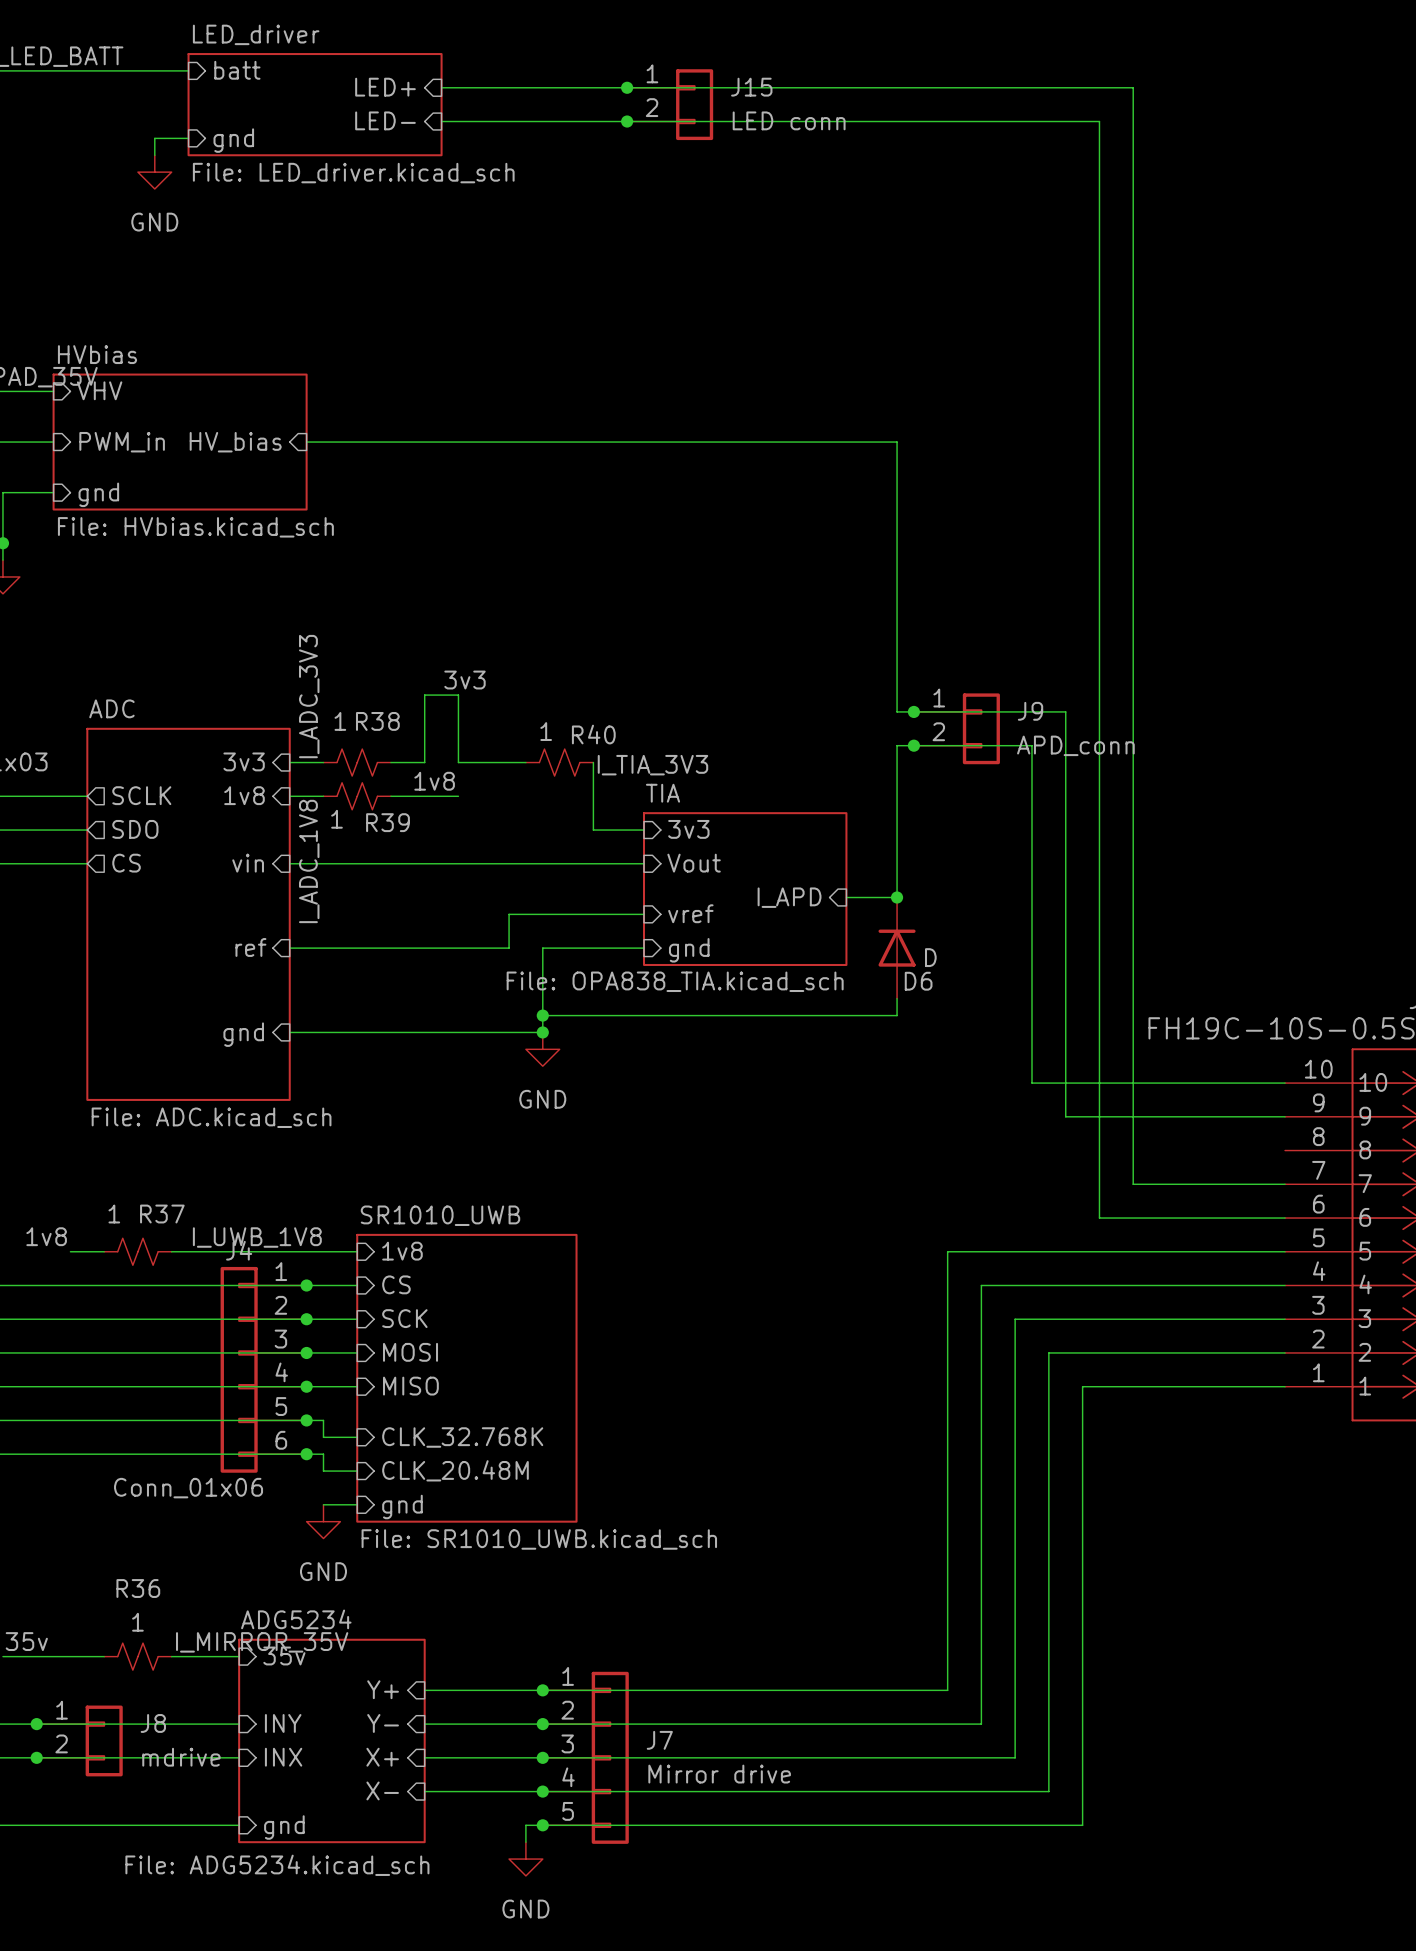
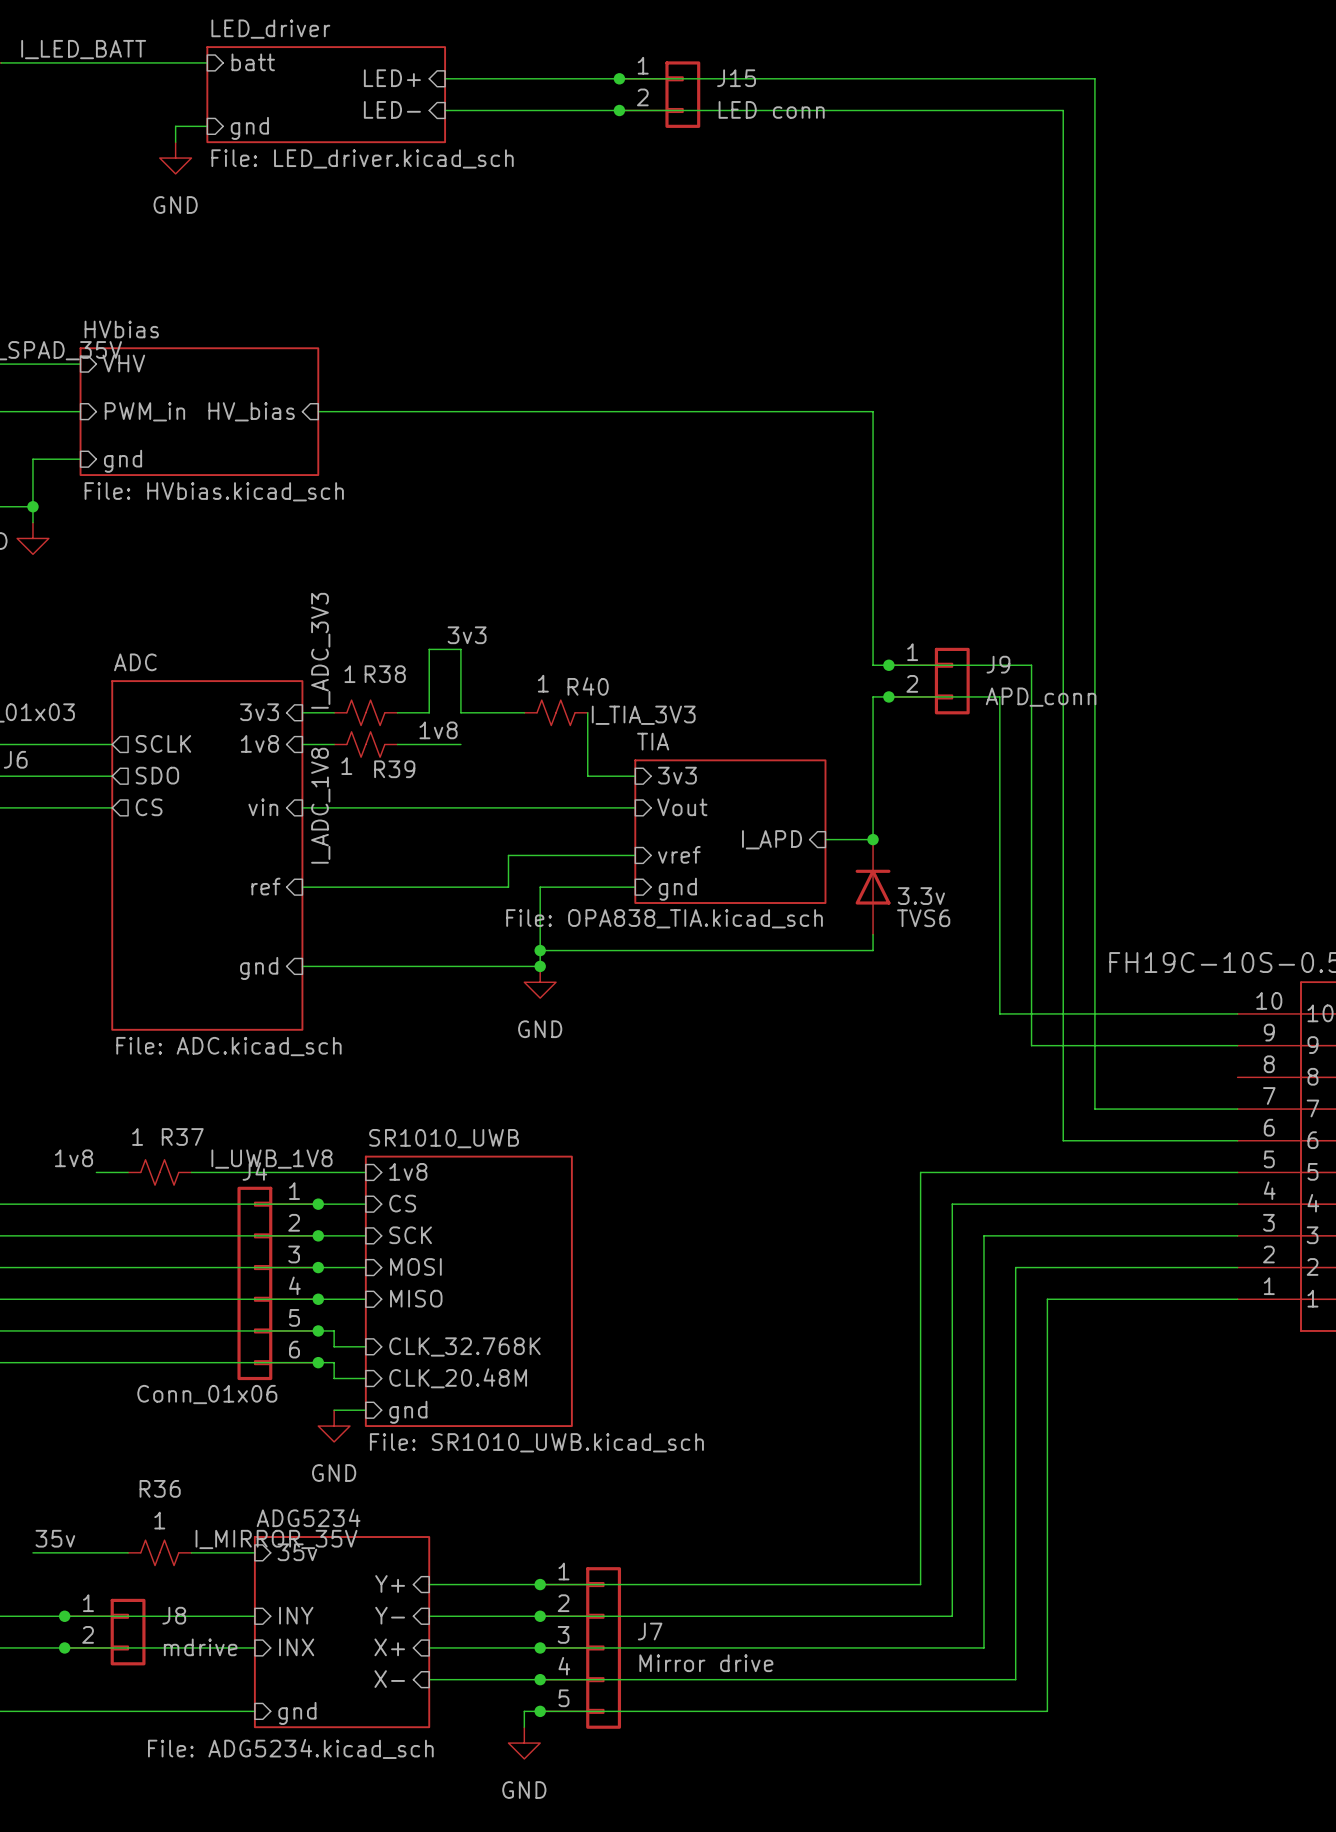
D6 value: D (930, 957) -> 3.3v (921, 896)
D6 name: D6 (918, 981) -> TVS6 (923, 918)

